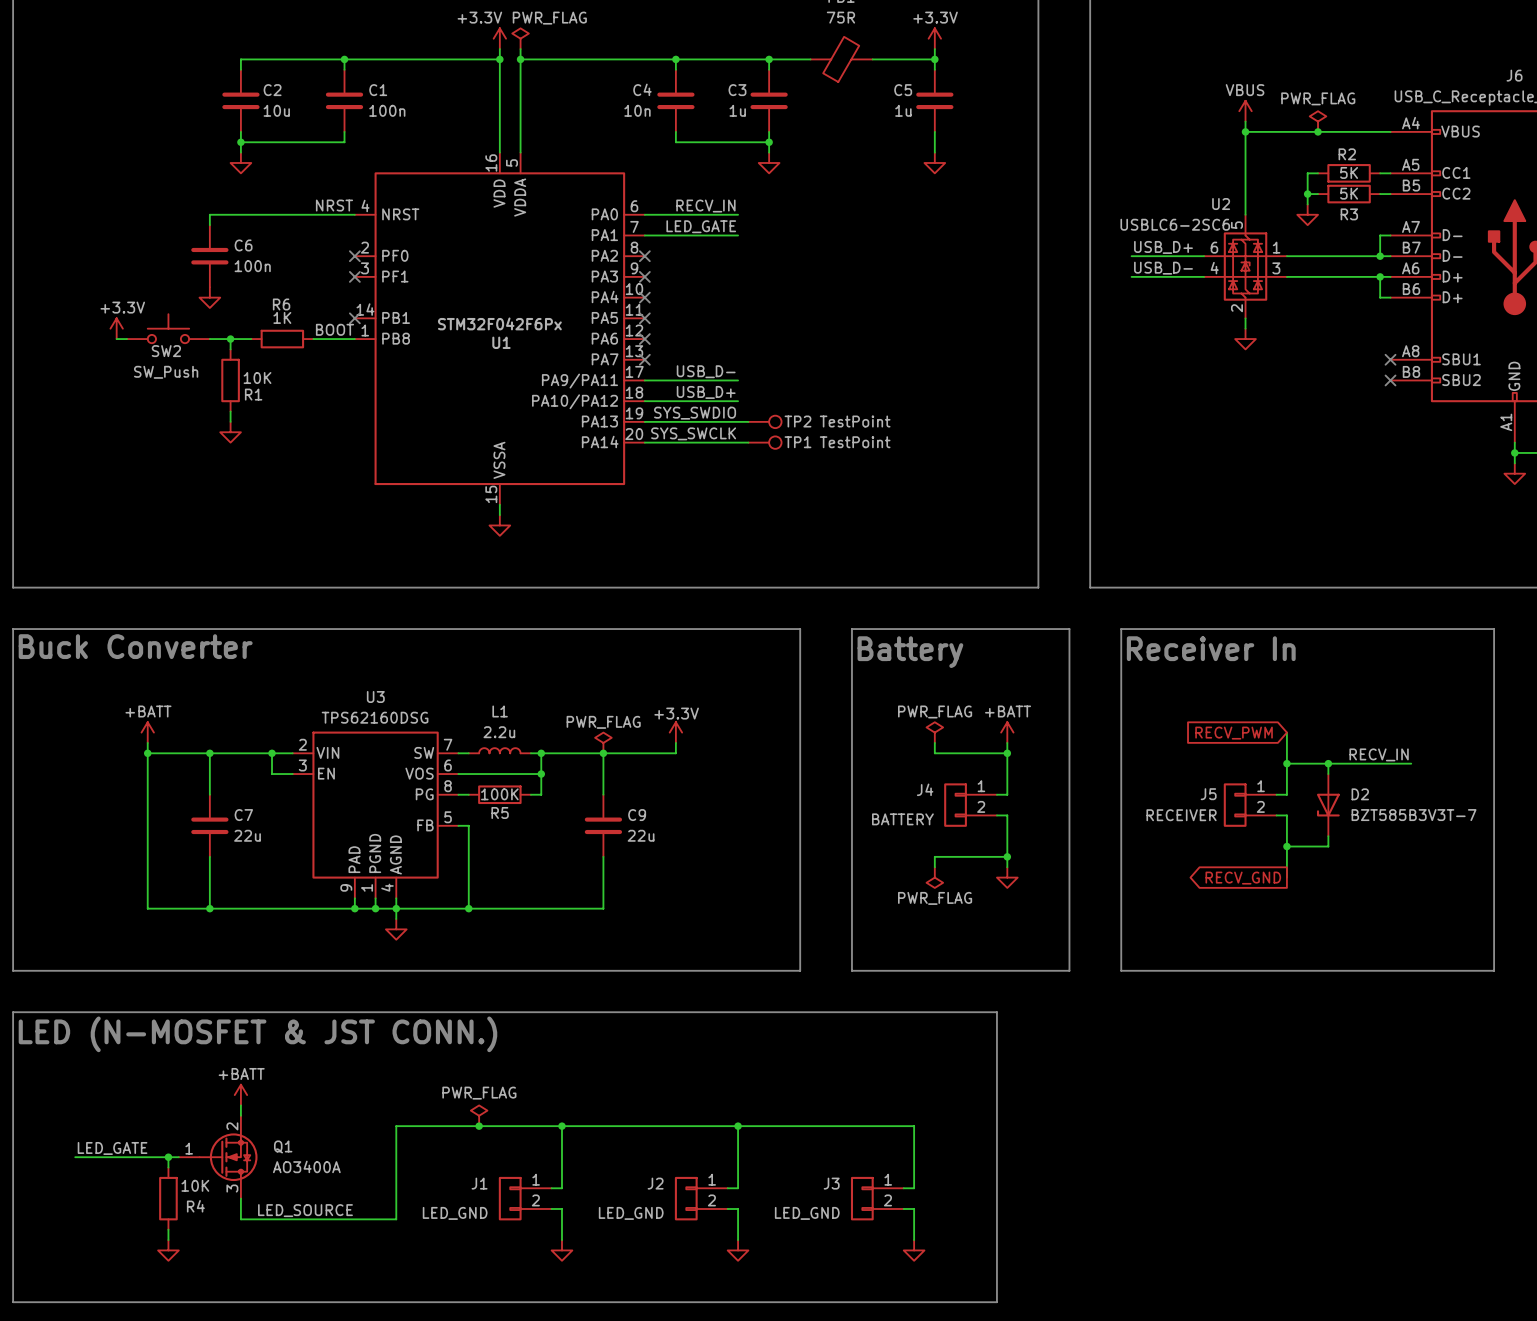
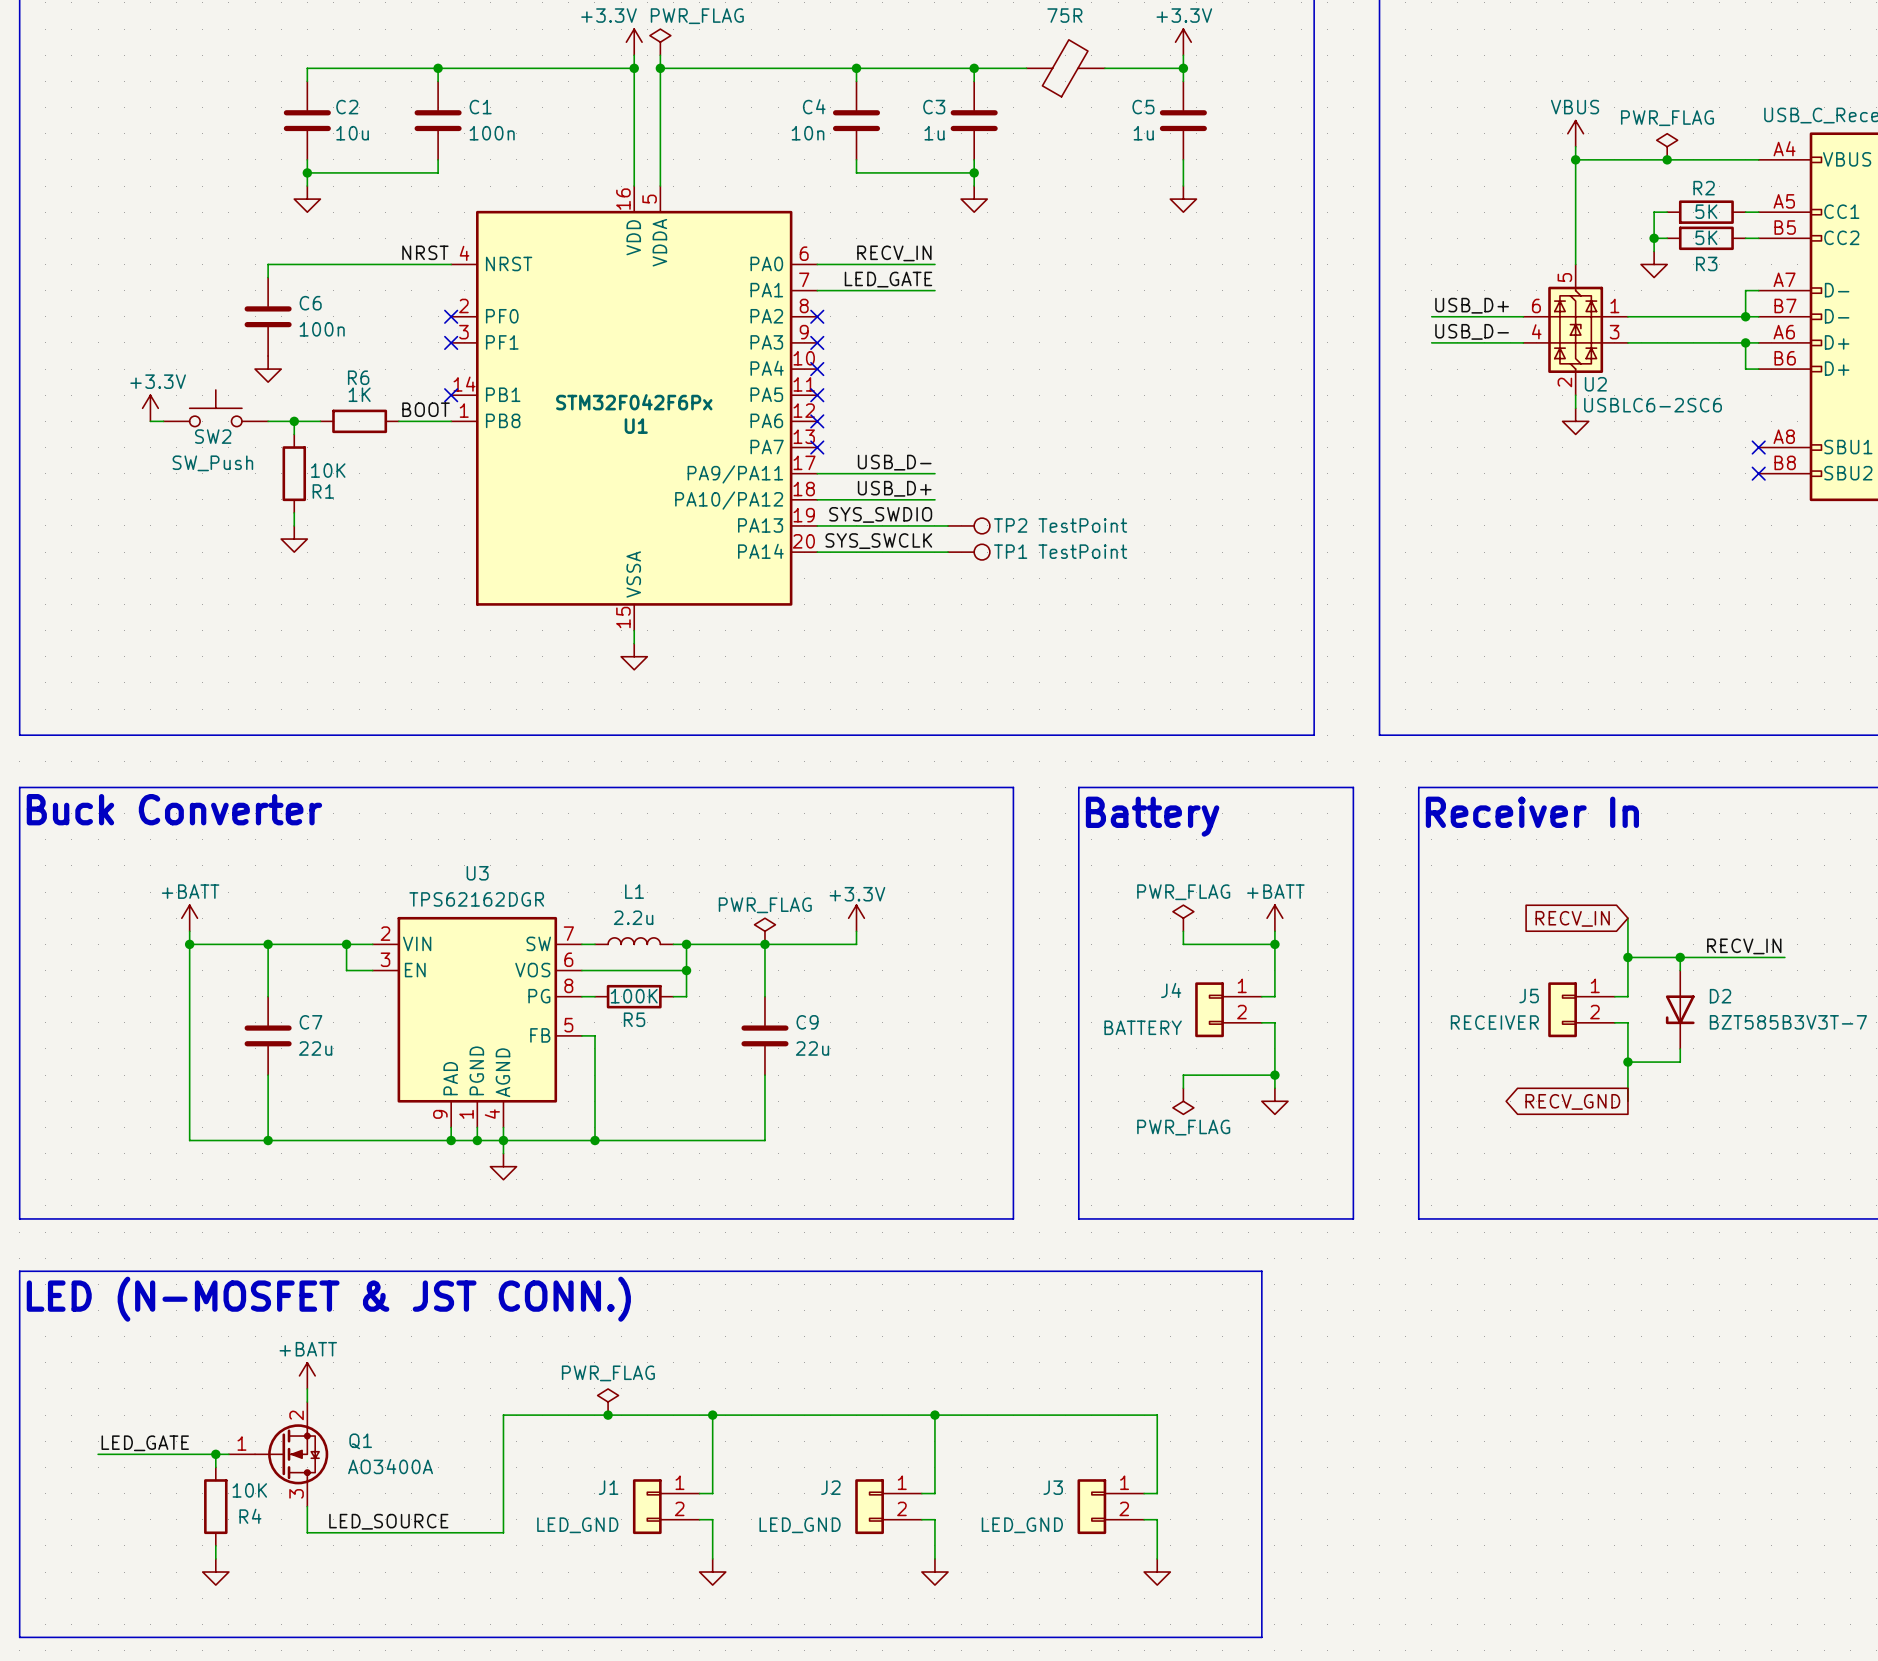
U2 name position: U2 (1221, 204) -> U2 (1595, 384)
U2 value position: USBLC6-2SC6 (1175, 224) -> USBLC6-2SC6 (1653, 405)
U3 value: TPS62160DSG (375, 717) -> TPS62162DGR (476, 899)
global label: RECV_PWM (1234, 733) -> RECV_IN (1572, 918)

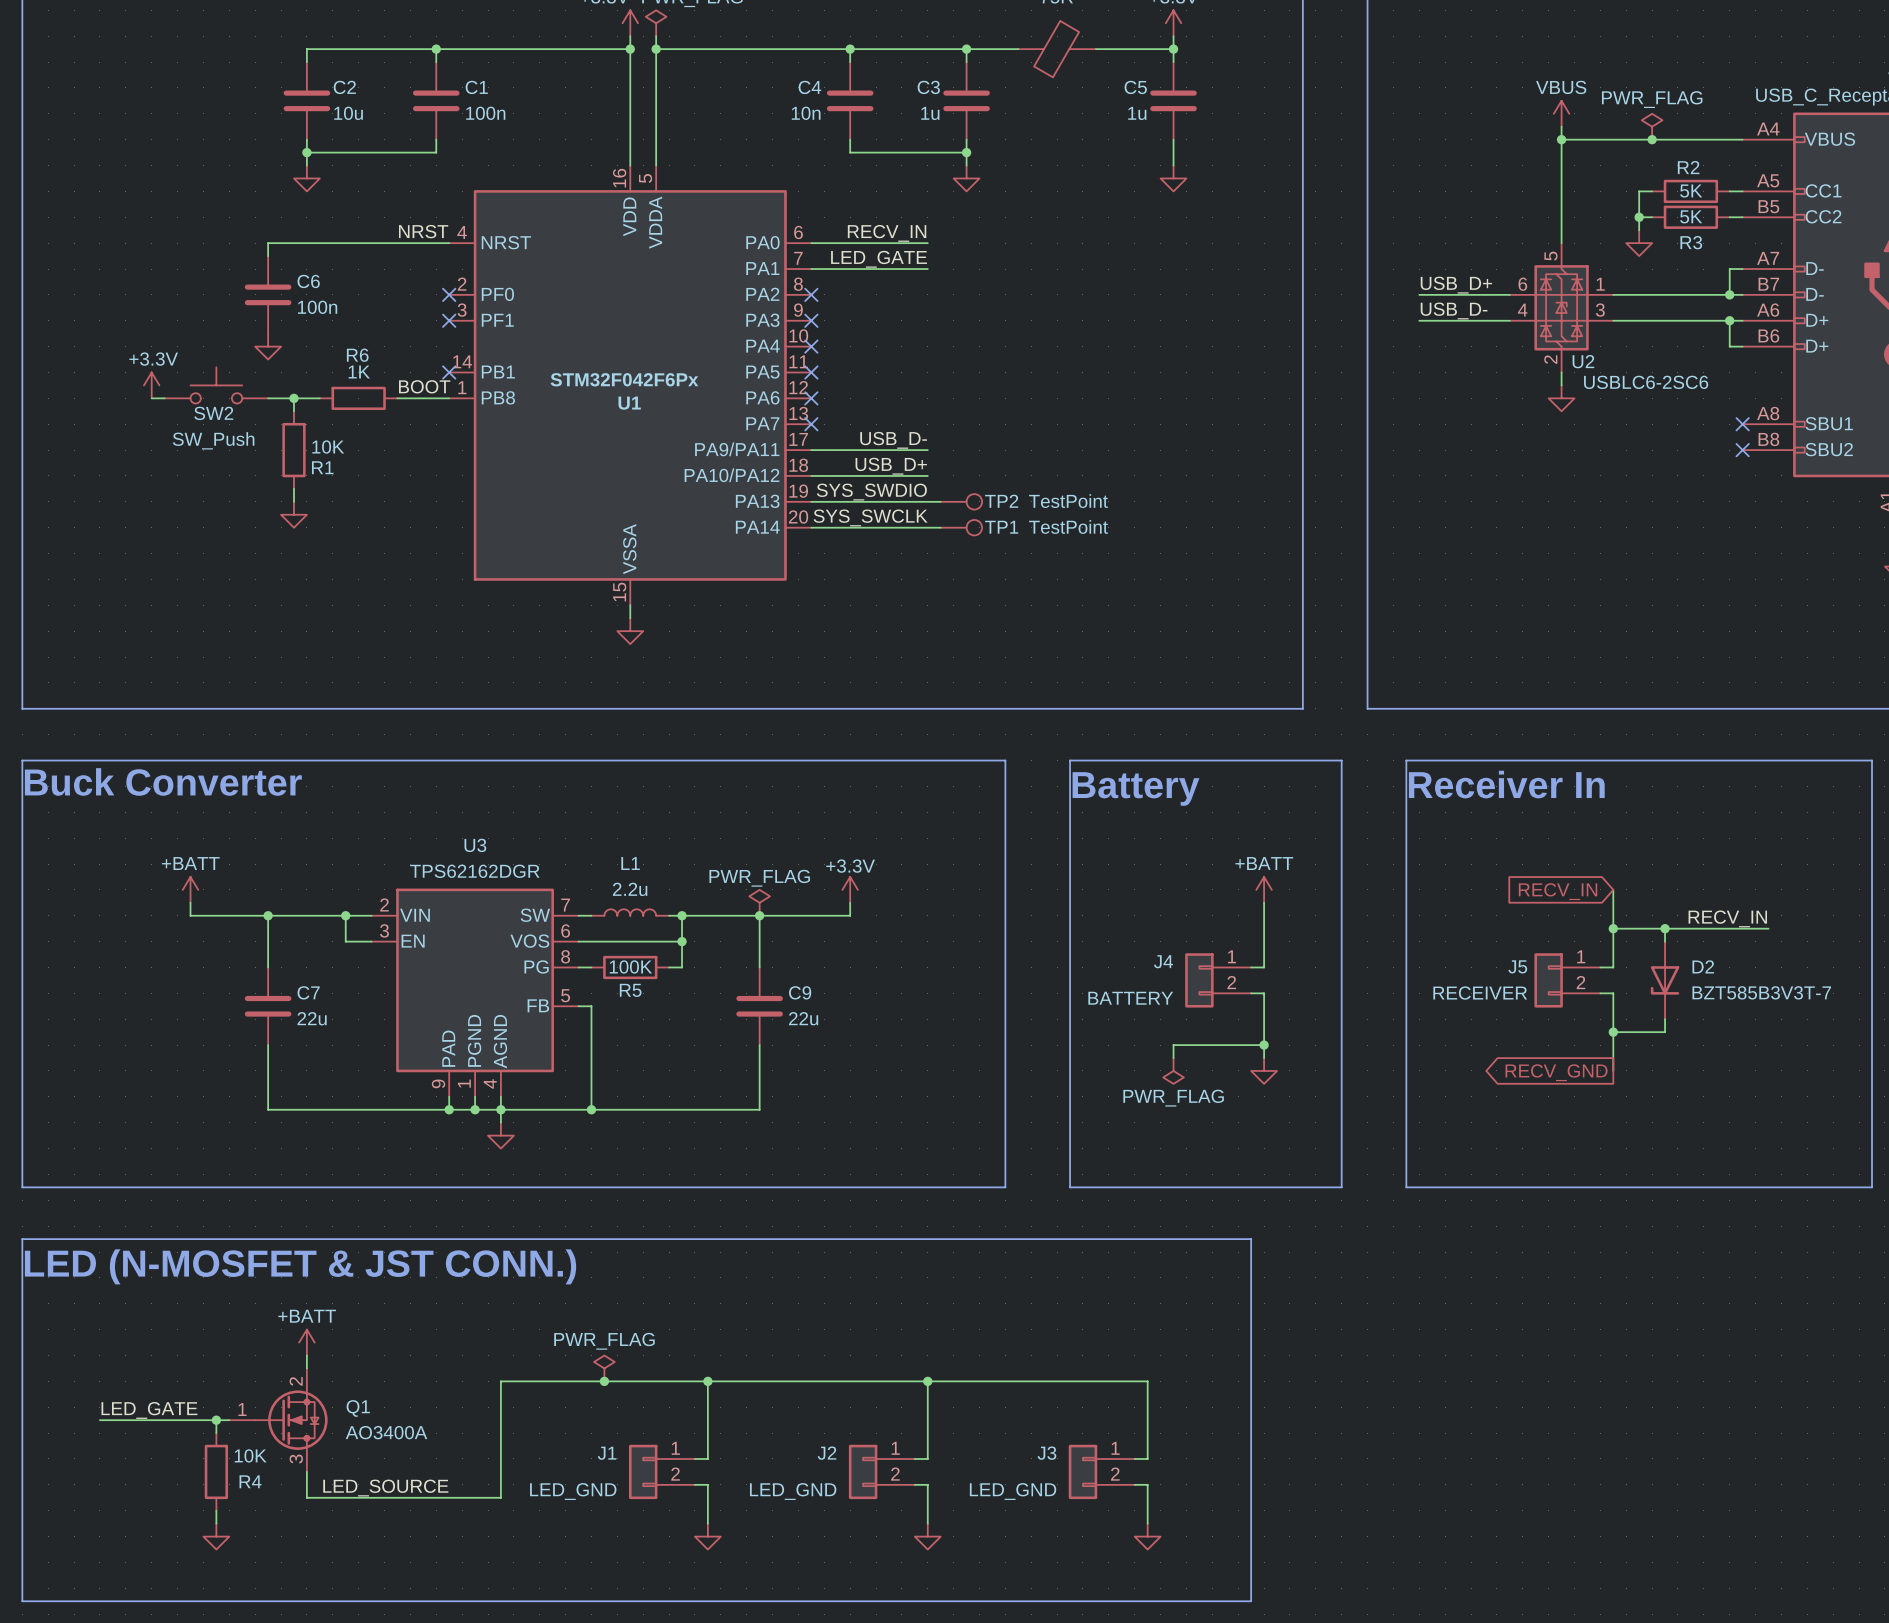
power symbol: PWR_FLAG (1183, 918) -> none
wire: (1183, 931) (1183, 944) (1274, 944) -> none
wire: (189, 944) (189, 1140) (268, 1140) -> none
junction: (189, 944) -> none
junction: (1274, 944) -> none
junction: (268, 1140) -> none

